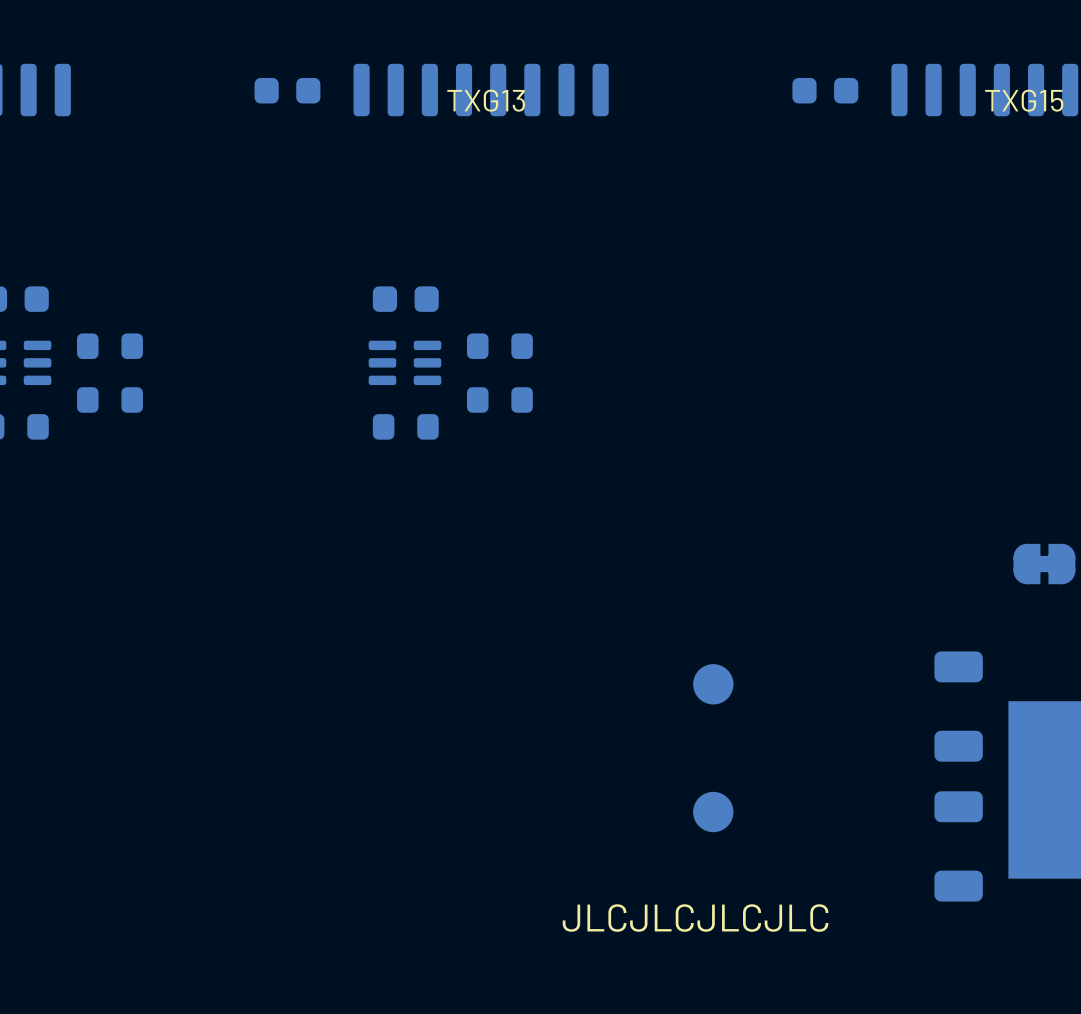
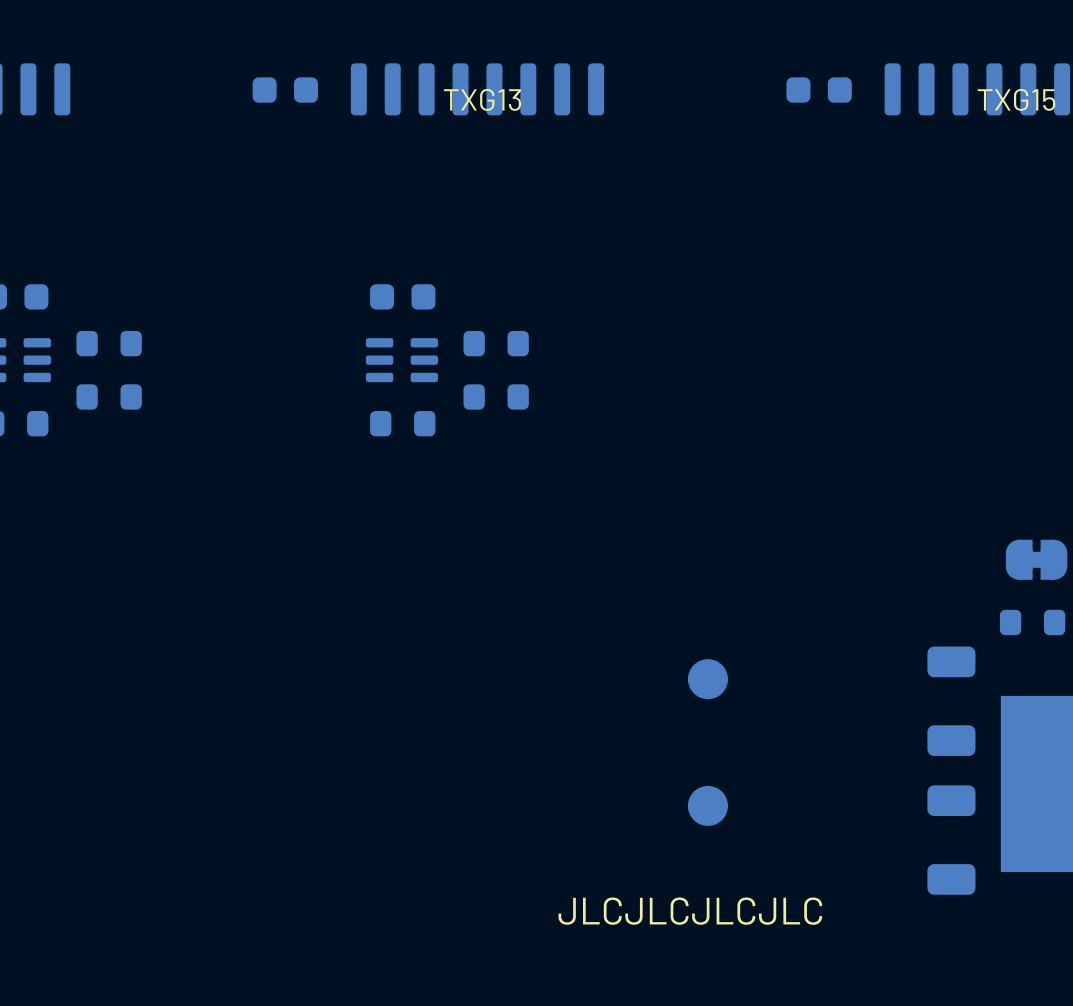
part: none -> (1032, 622)

